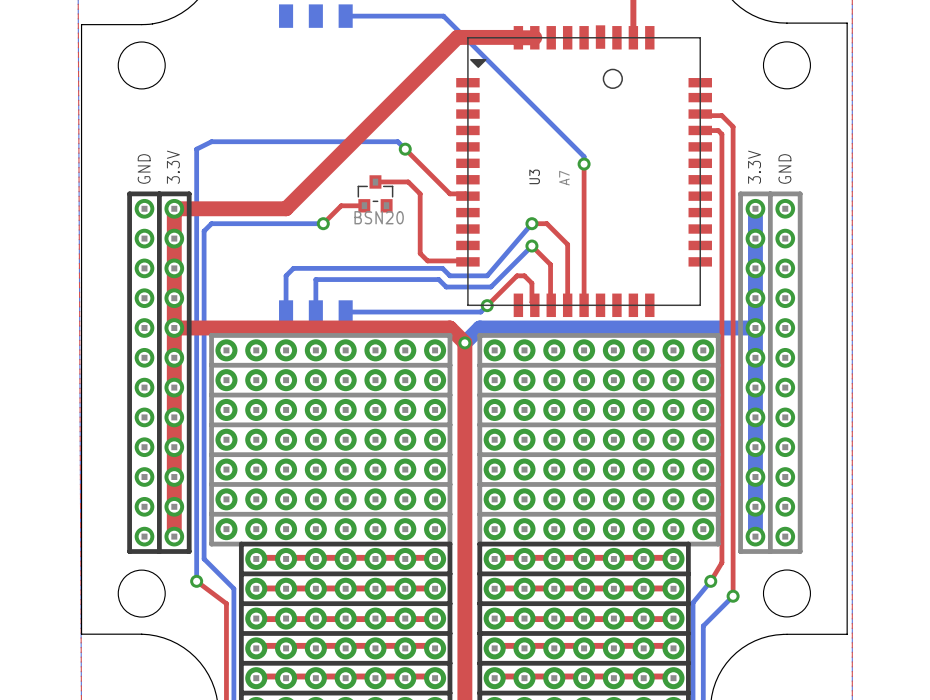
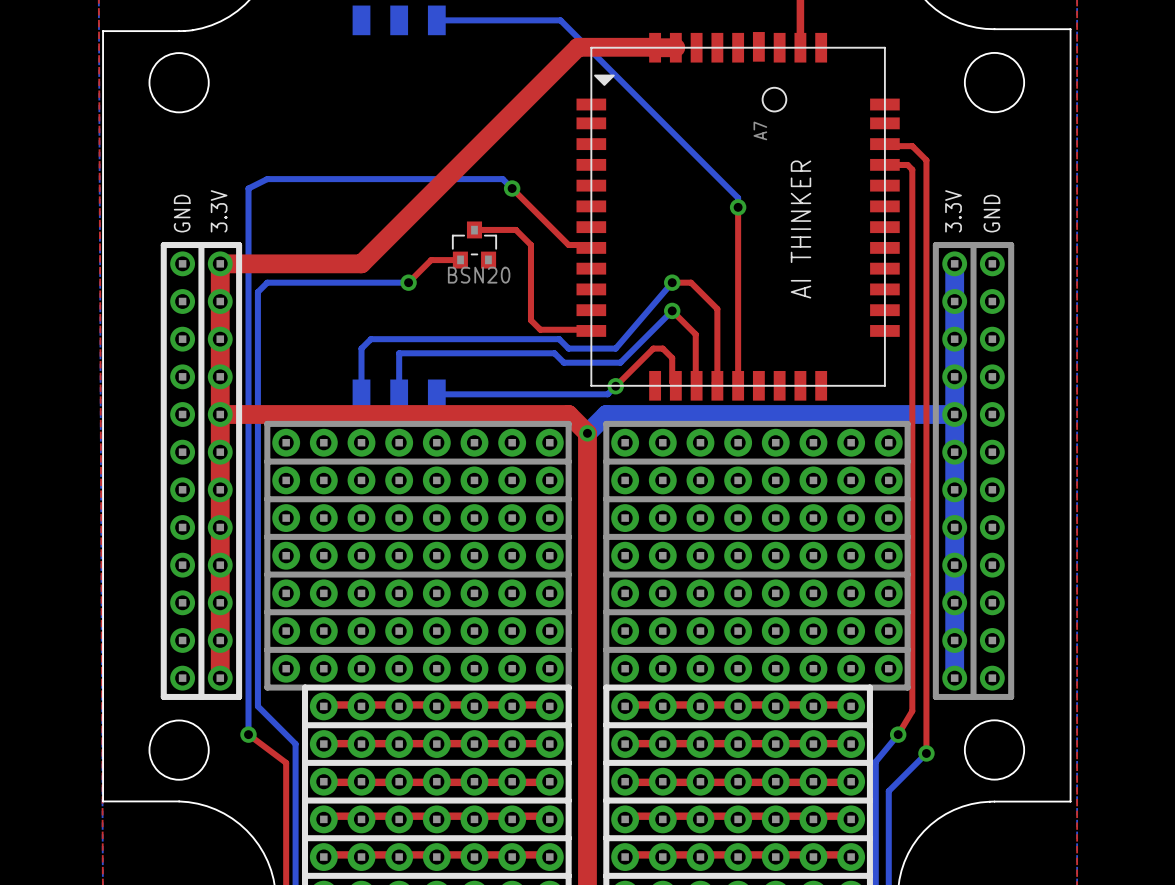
U3 name: U3 (534, 176) -> none
U3 value position: A7 (564, 178) -> A7 (760, 130)
text: none -> AI THINKER (801, 229)

